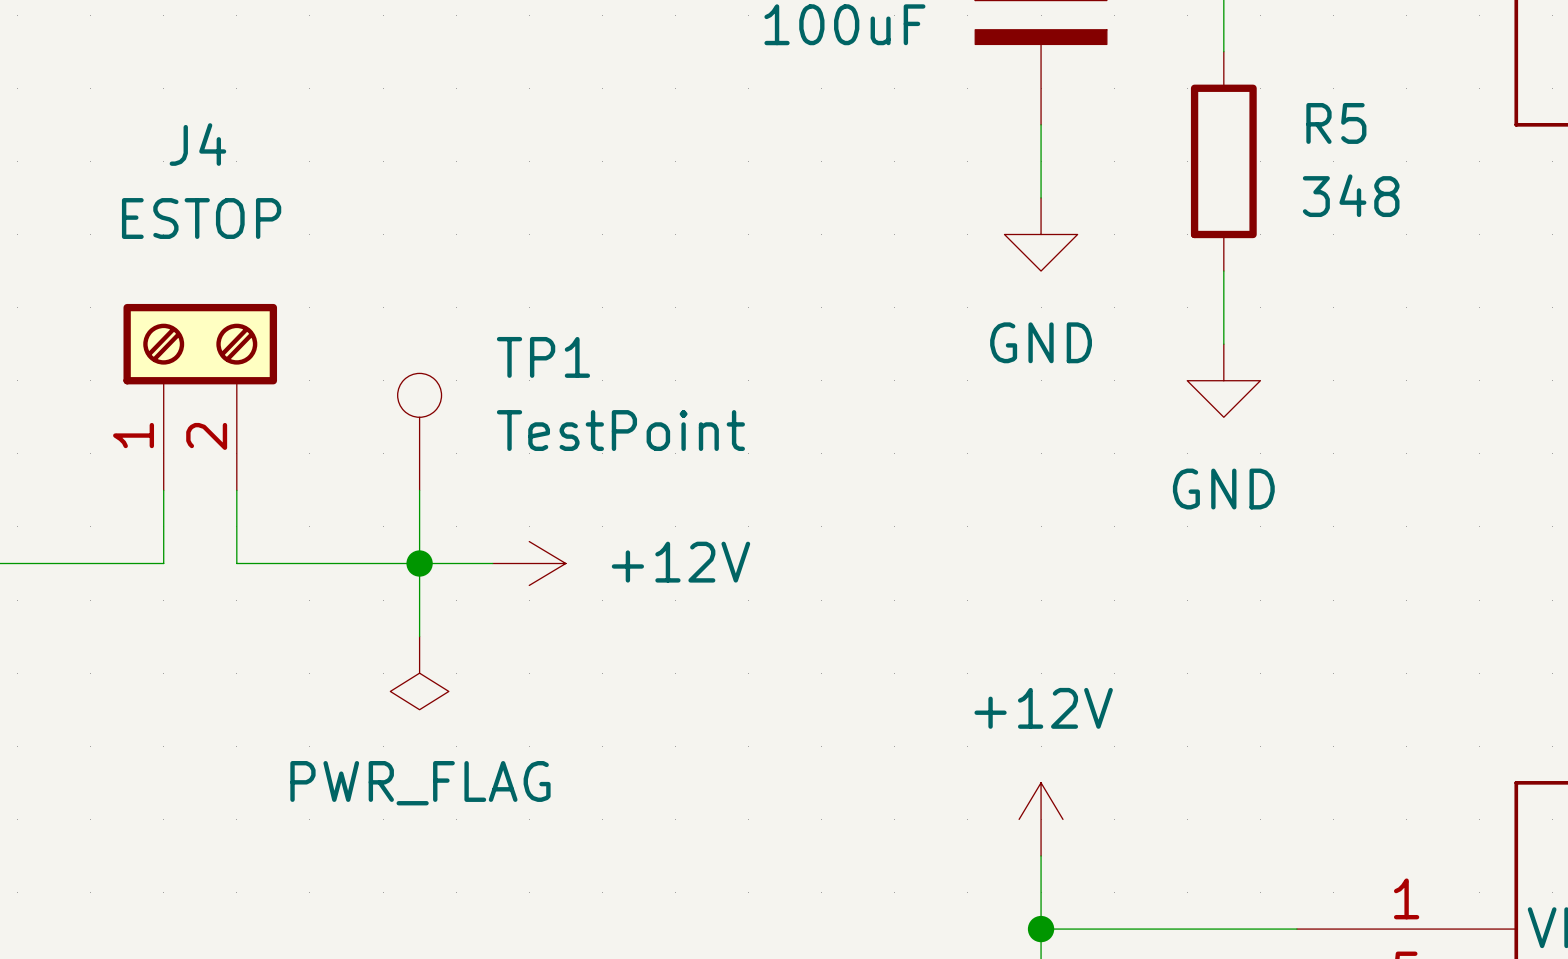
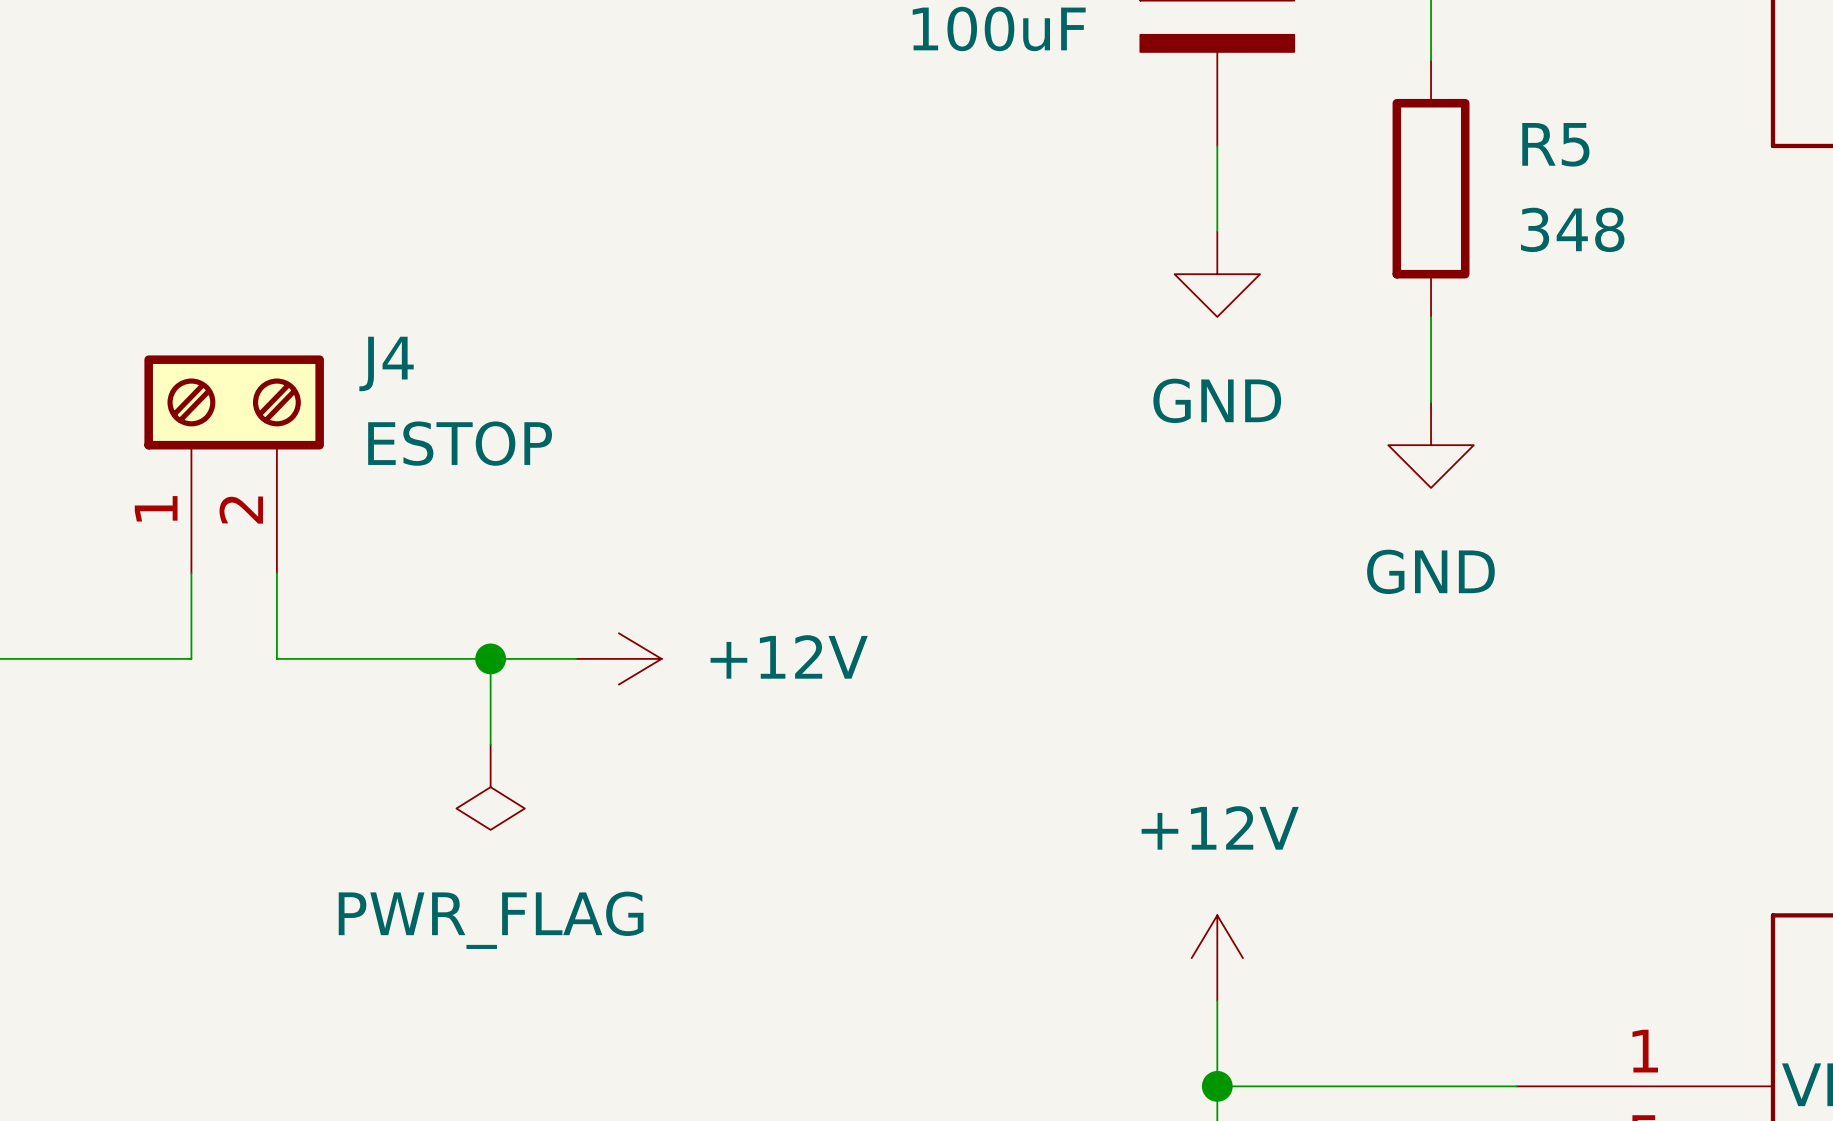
J4 name position: J4 (197, 144) -> J4 (386, 363)
J4 value position: ESTOP (201, 218) -> ESTOP (460, 443)
TP1: TestPoint (419, 431) -> none
wire: (419, 490) (419, 563) -> none

